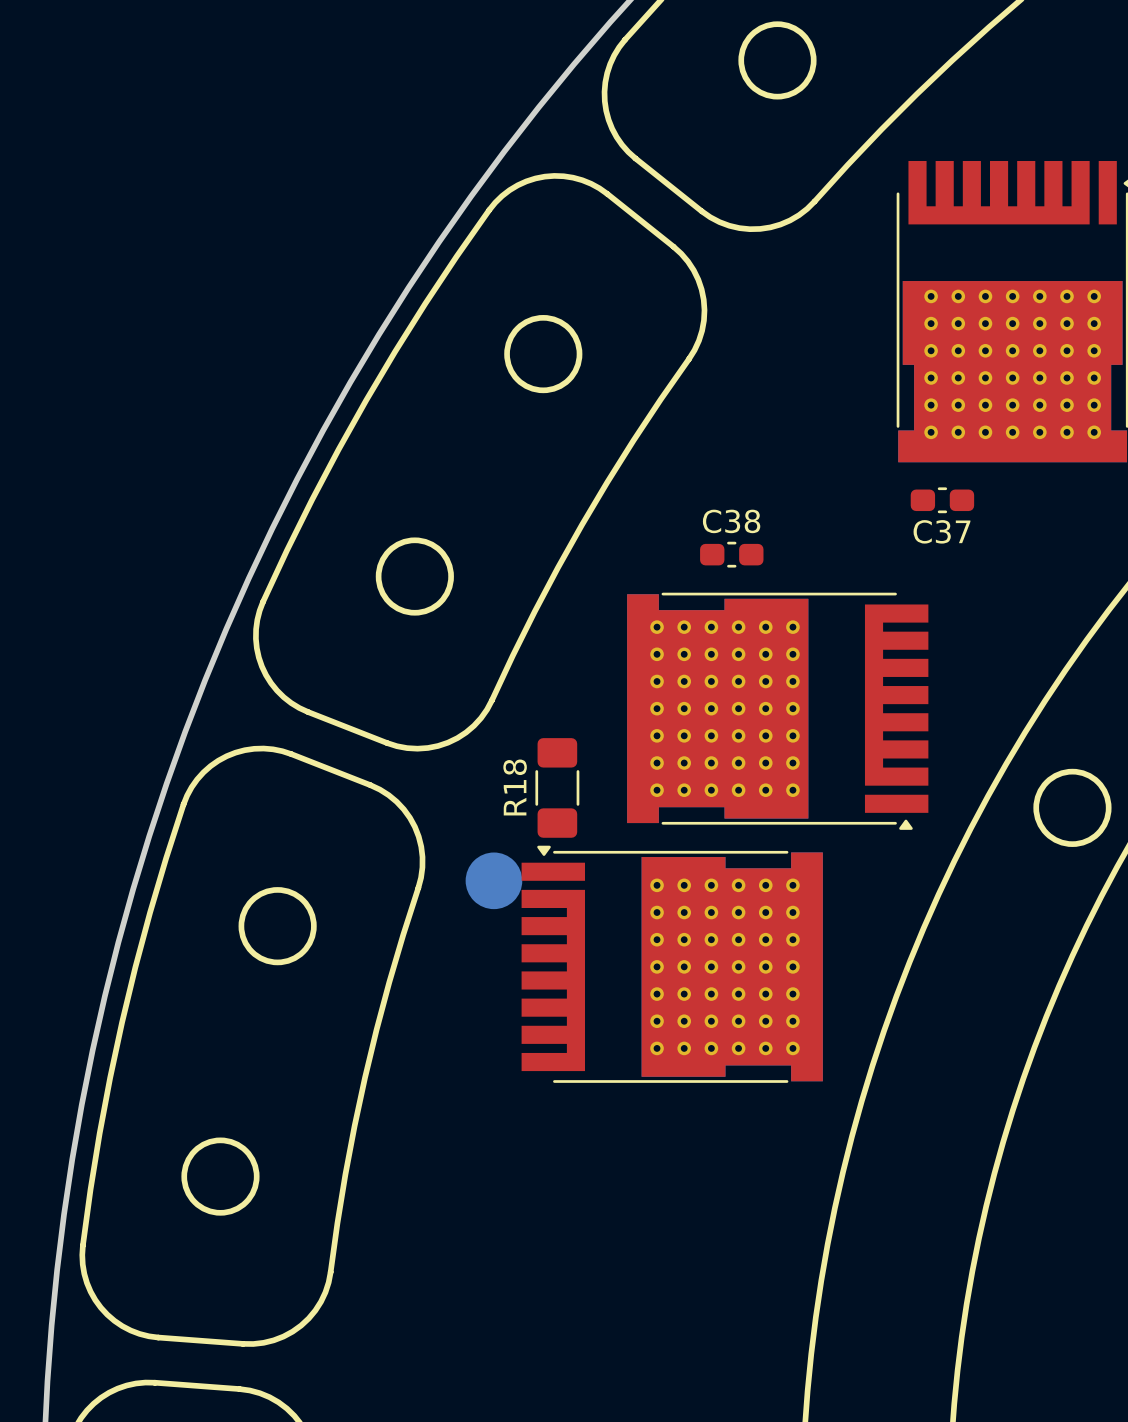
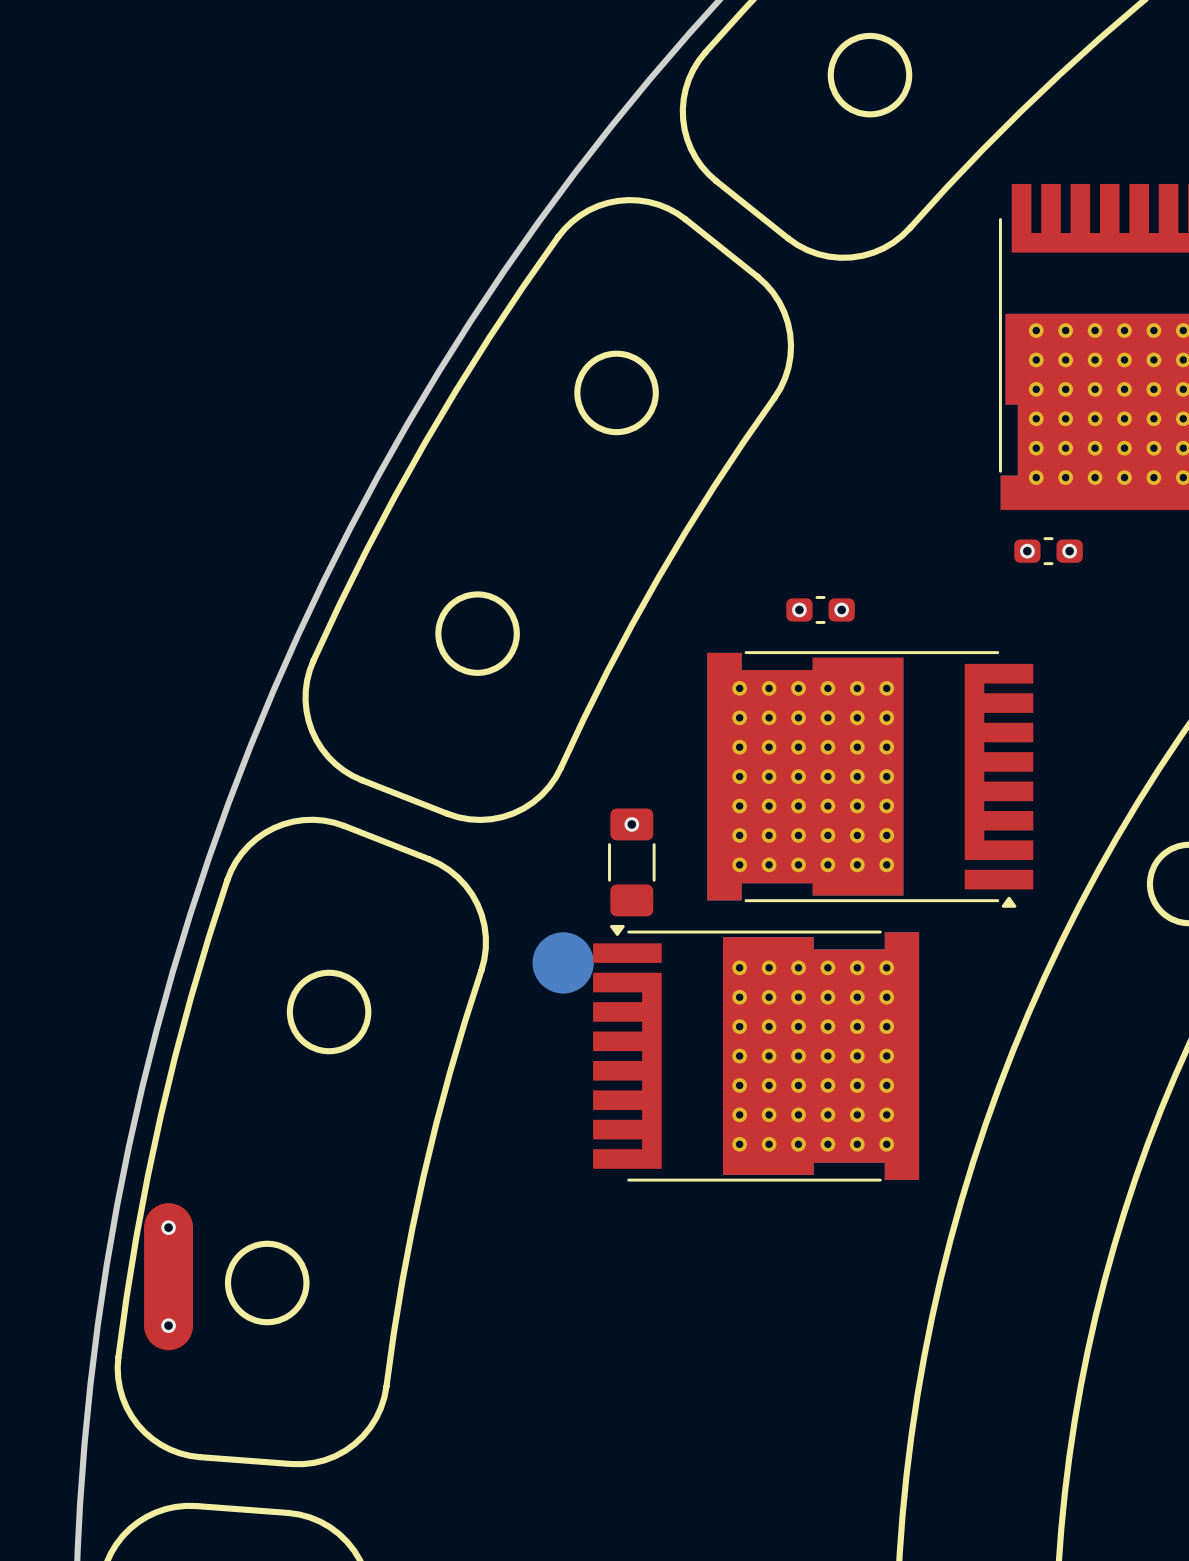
via: none -> (1027, 551)
via: none -> (1069, 551)
C38 name: C38 (731, 521) -> none
C37 name: C37 (941, 531) -> none
via: none -> (799, 609)
via: none -> (841, 609)
via: none -> (631, 824)
R18 name: R18 (515, 787) -> none
via: none -> (168, 1227)
part: none -> (168, 1276)
via: none -> (168, 1325)

